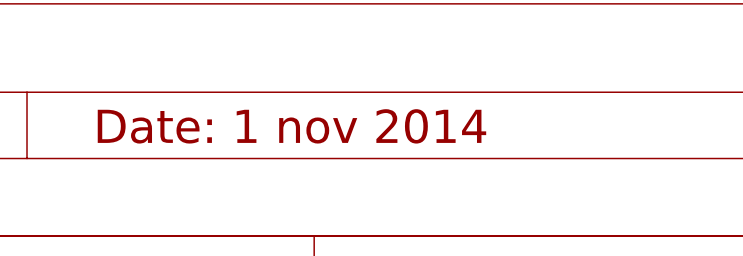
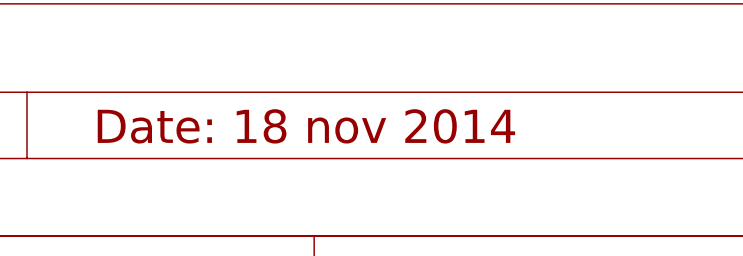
title block: Date: 1 nov 2014 (291, 126) -> Date: 18 nov 2014 (306, 126)

